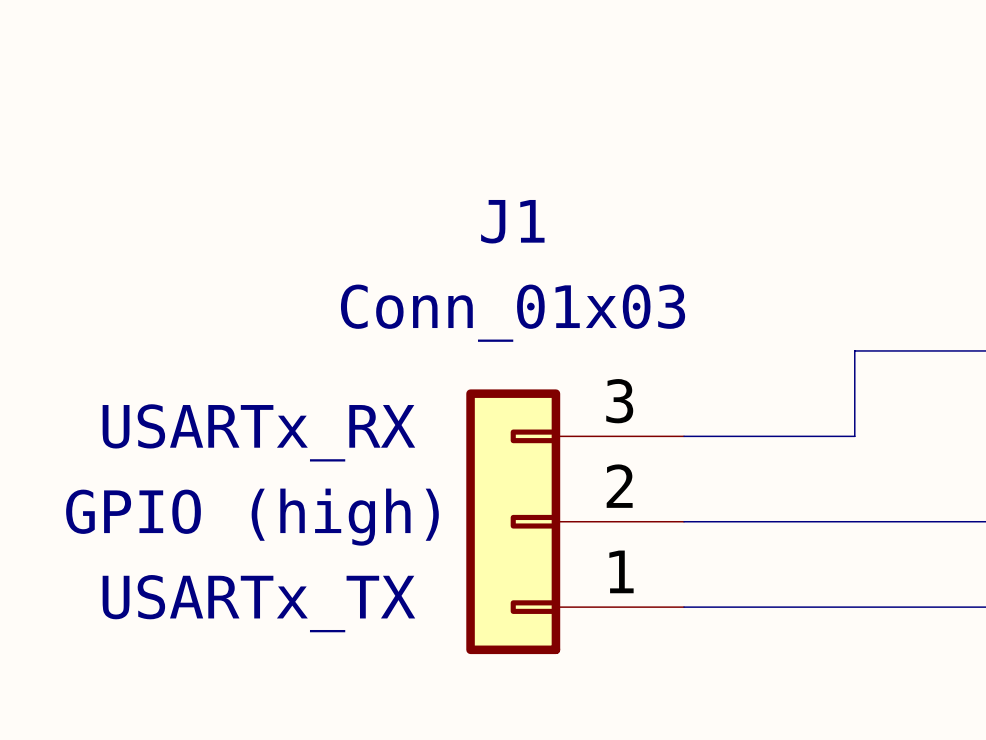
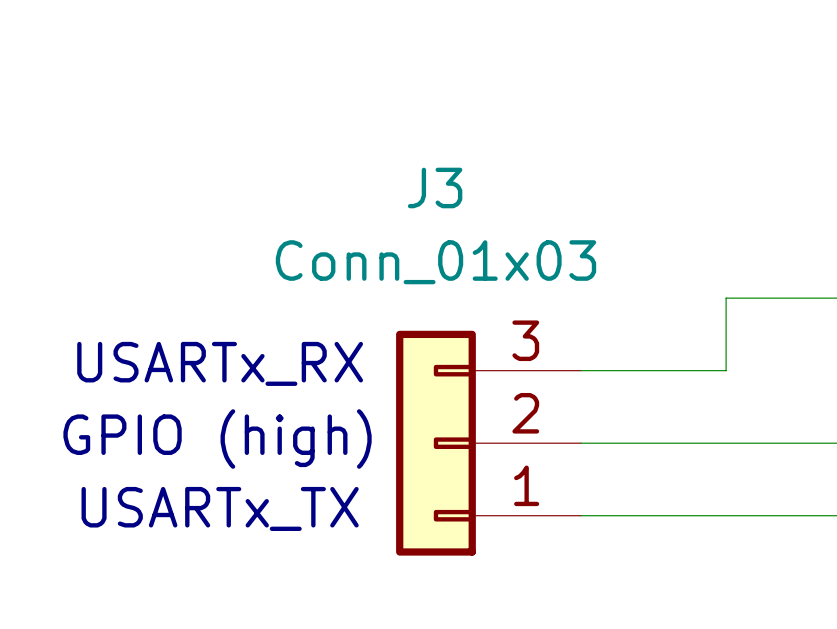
J1 name: J1 (512, 221) -> J3 (435, 187)

